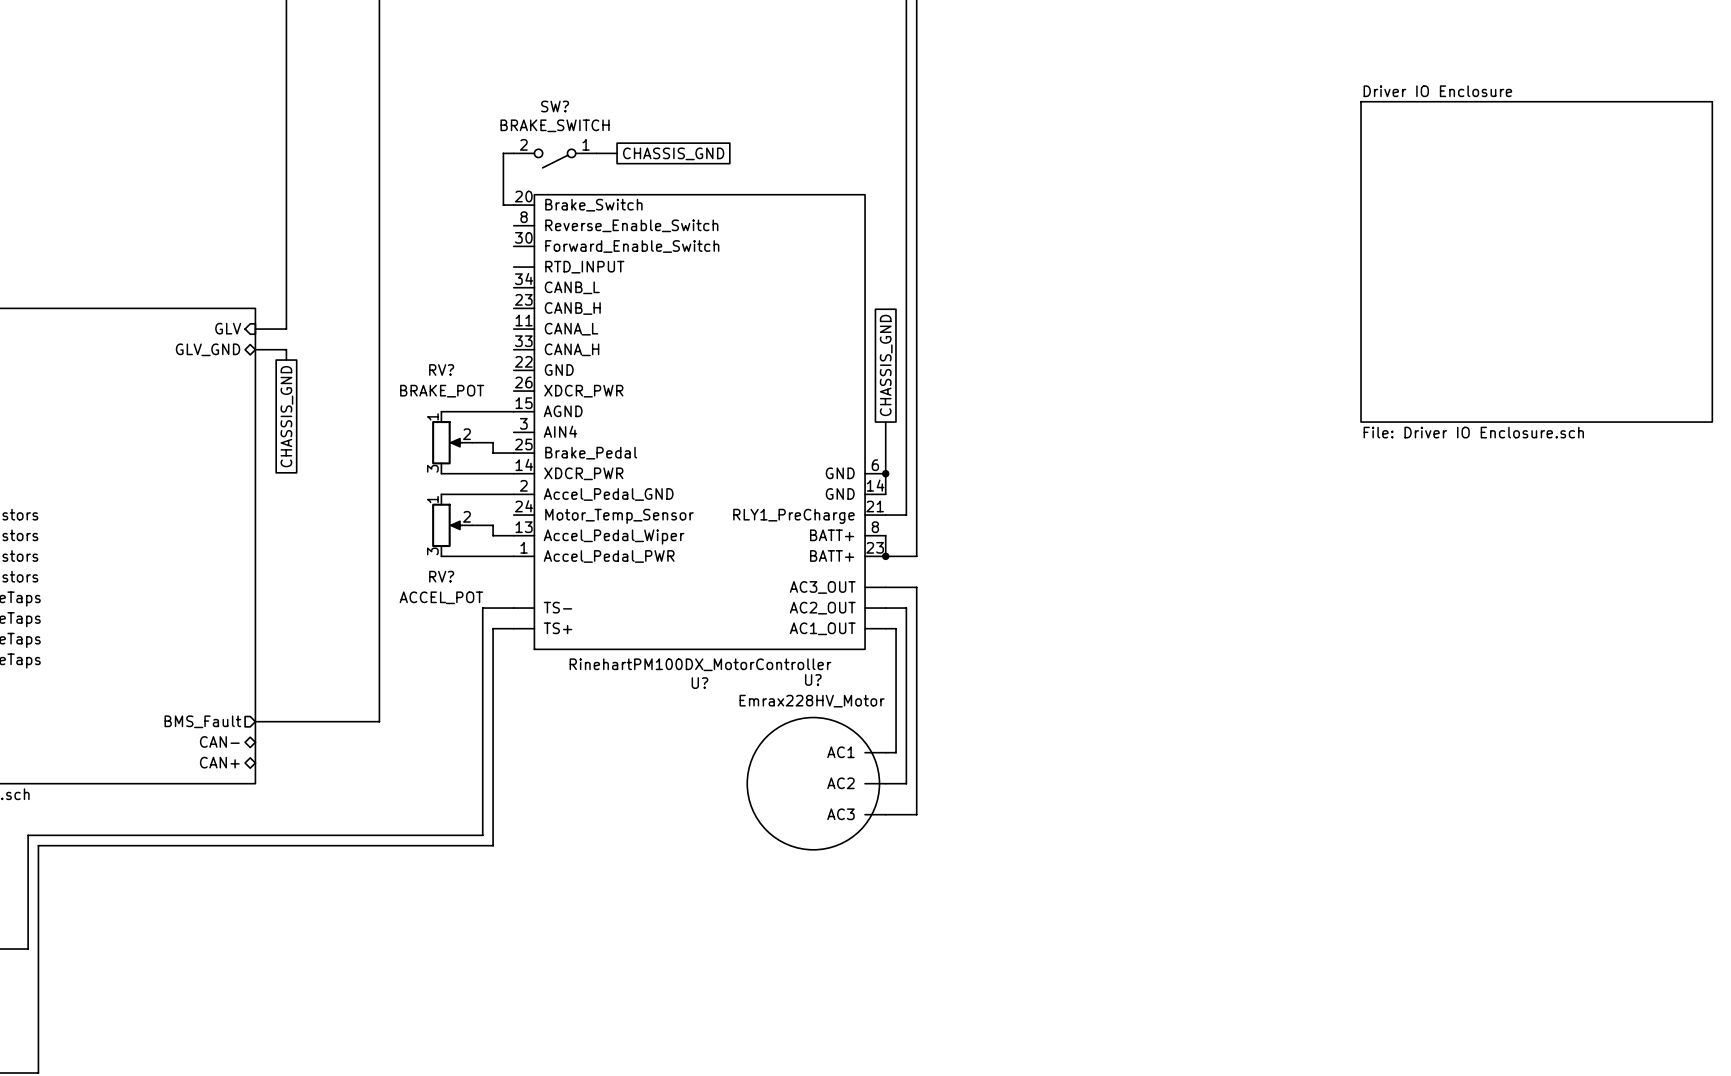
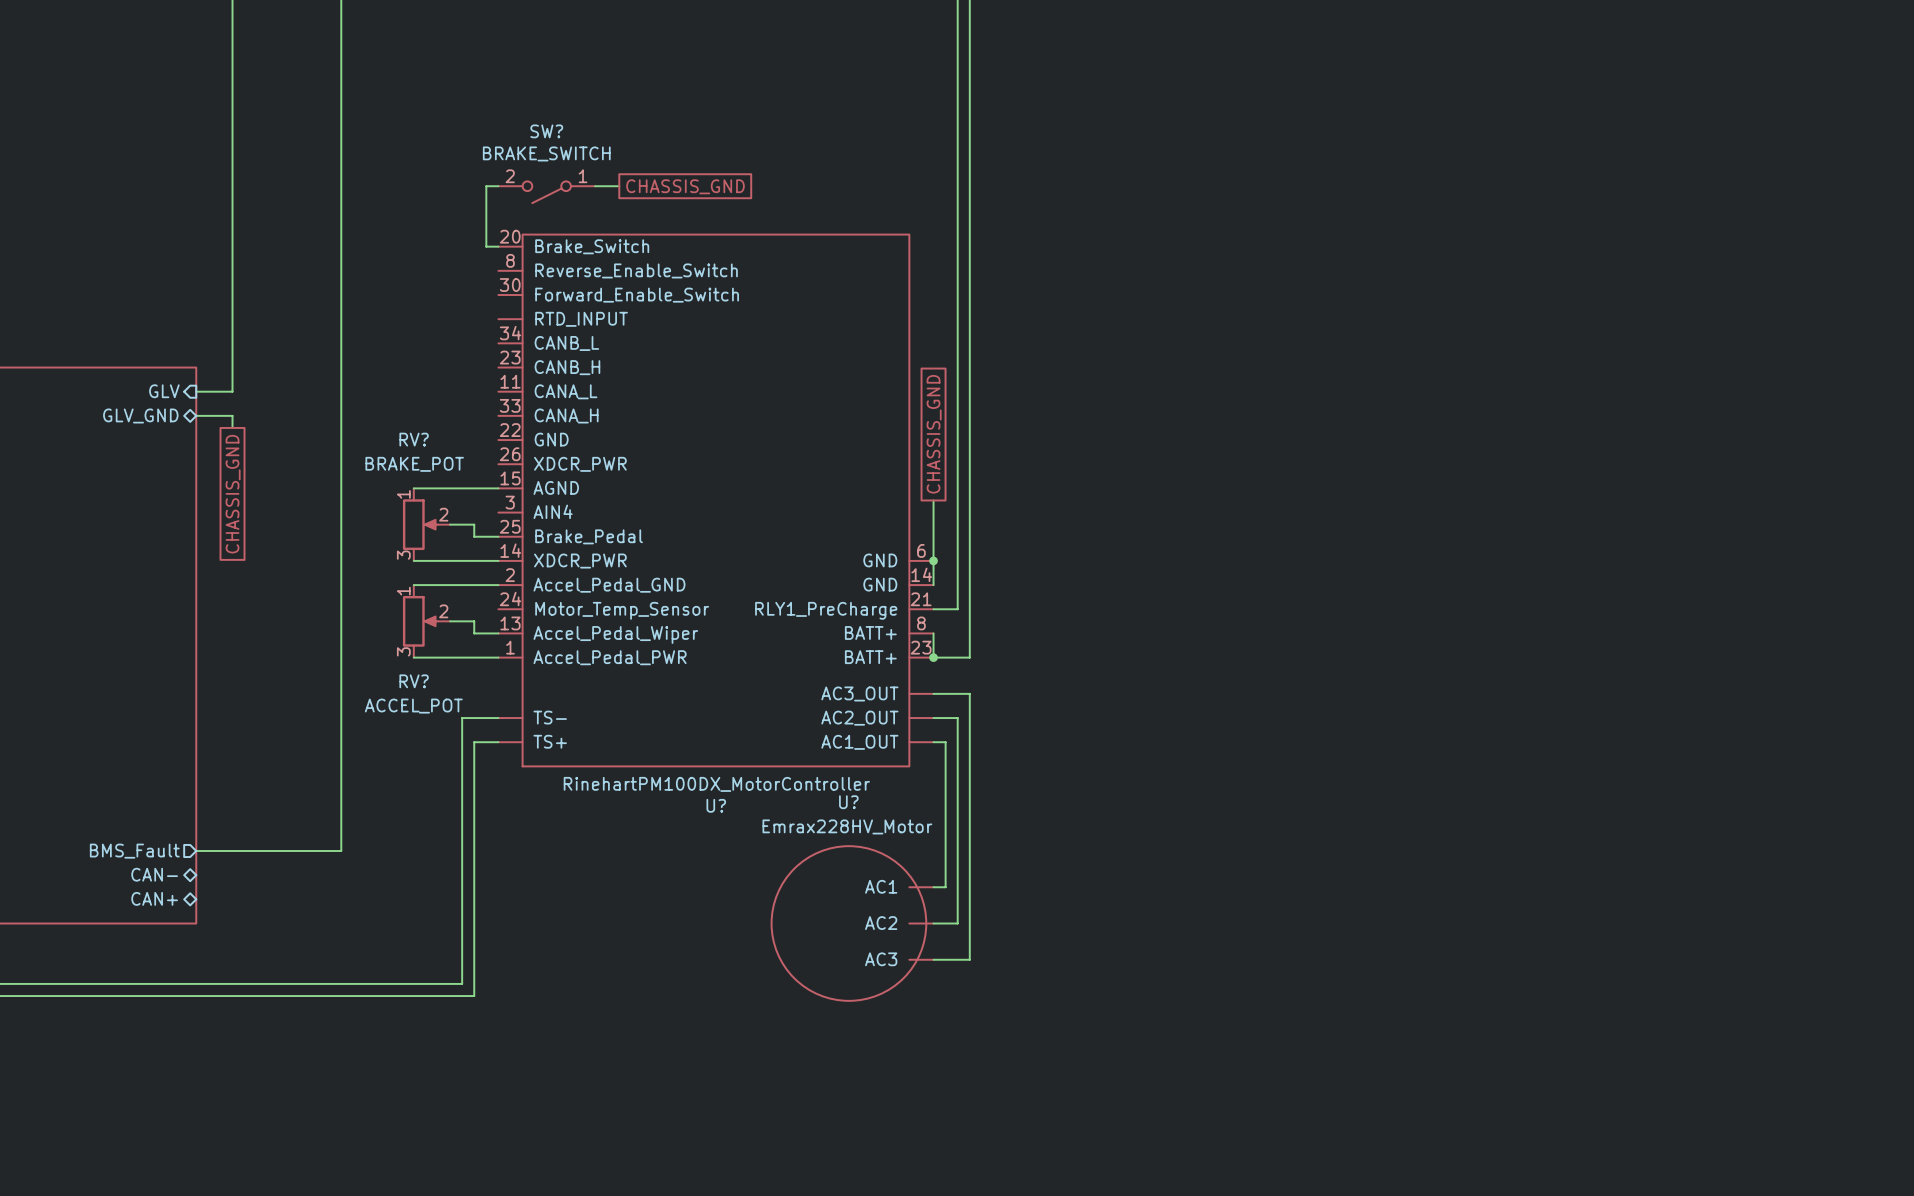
sheet Driver IO Enclosure: File: Driver IO Enclosure.sch (1536, 261) -> none

